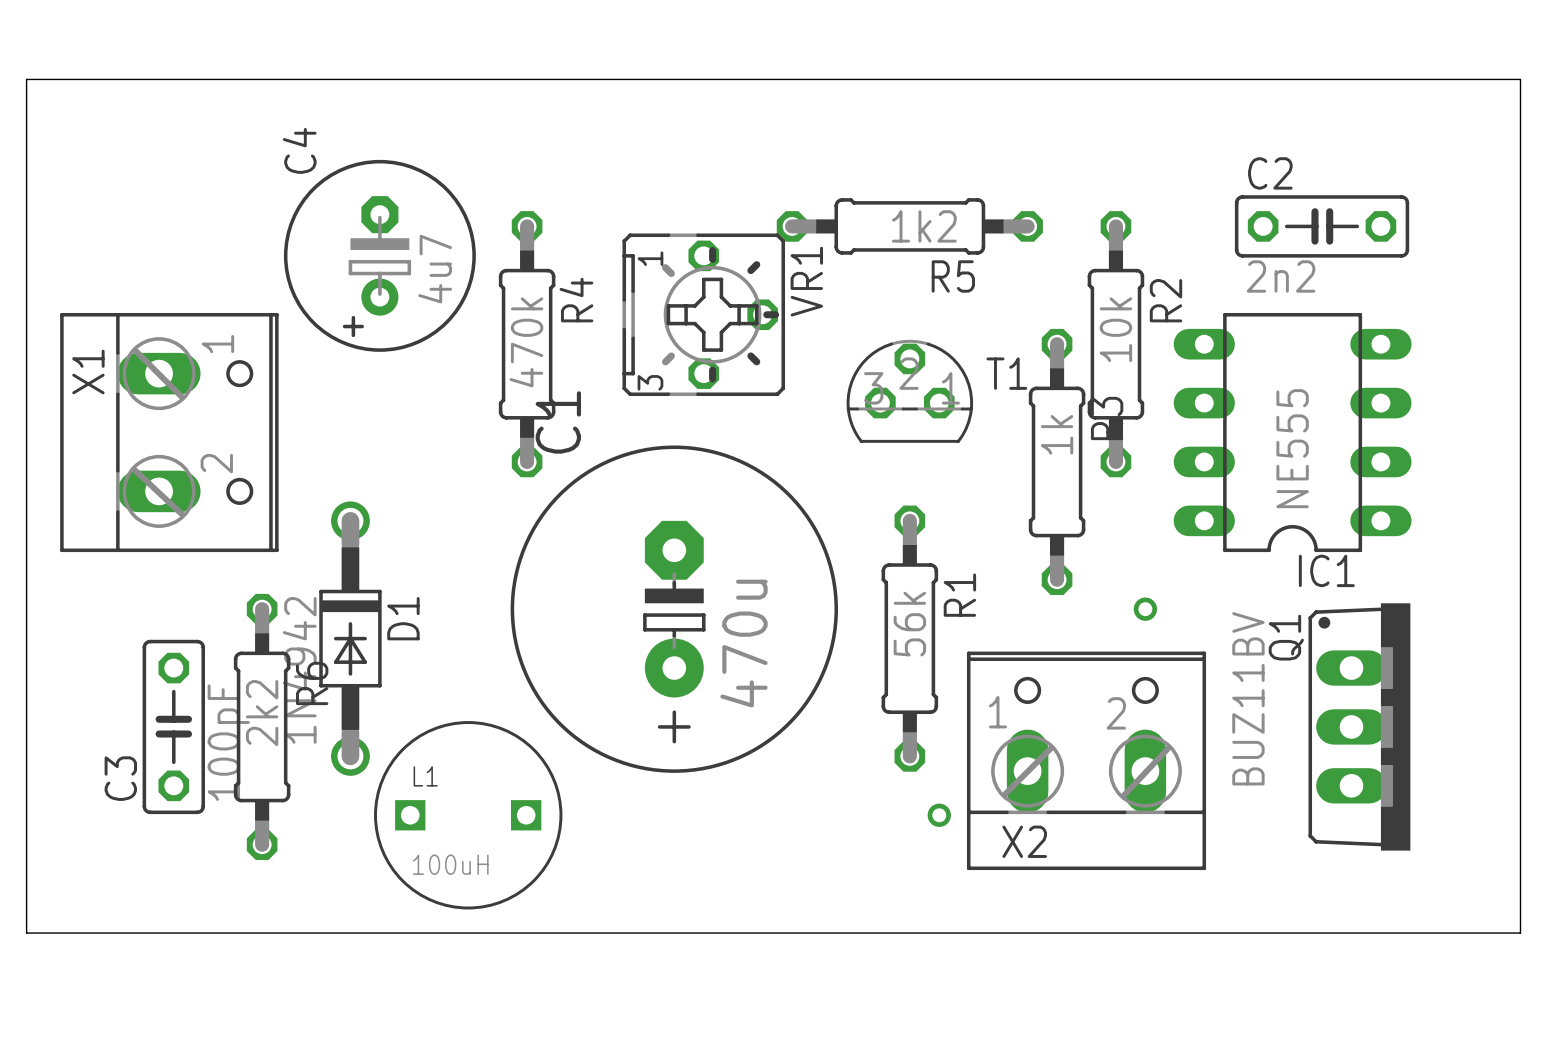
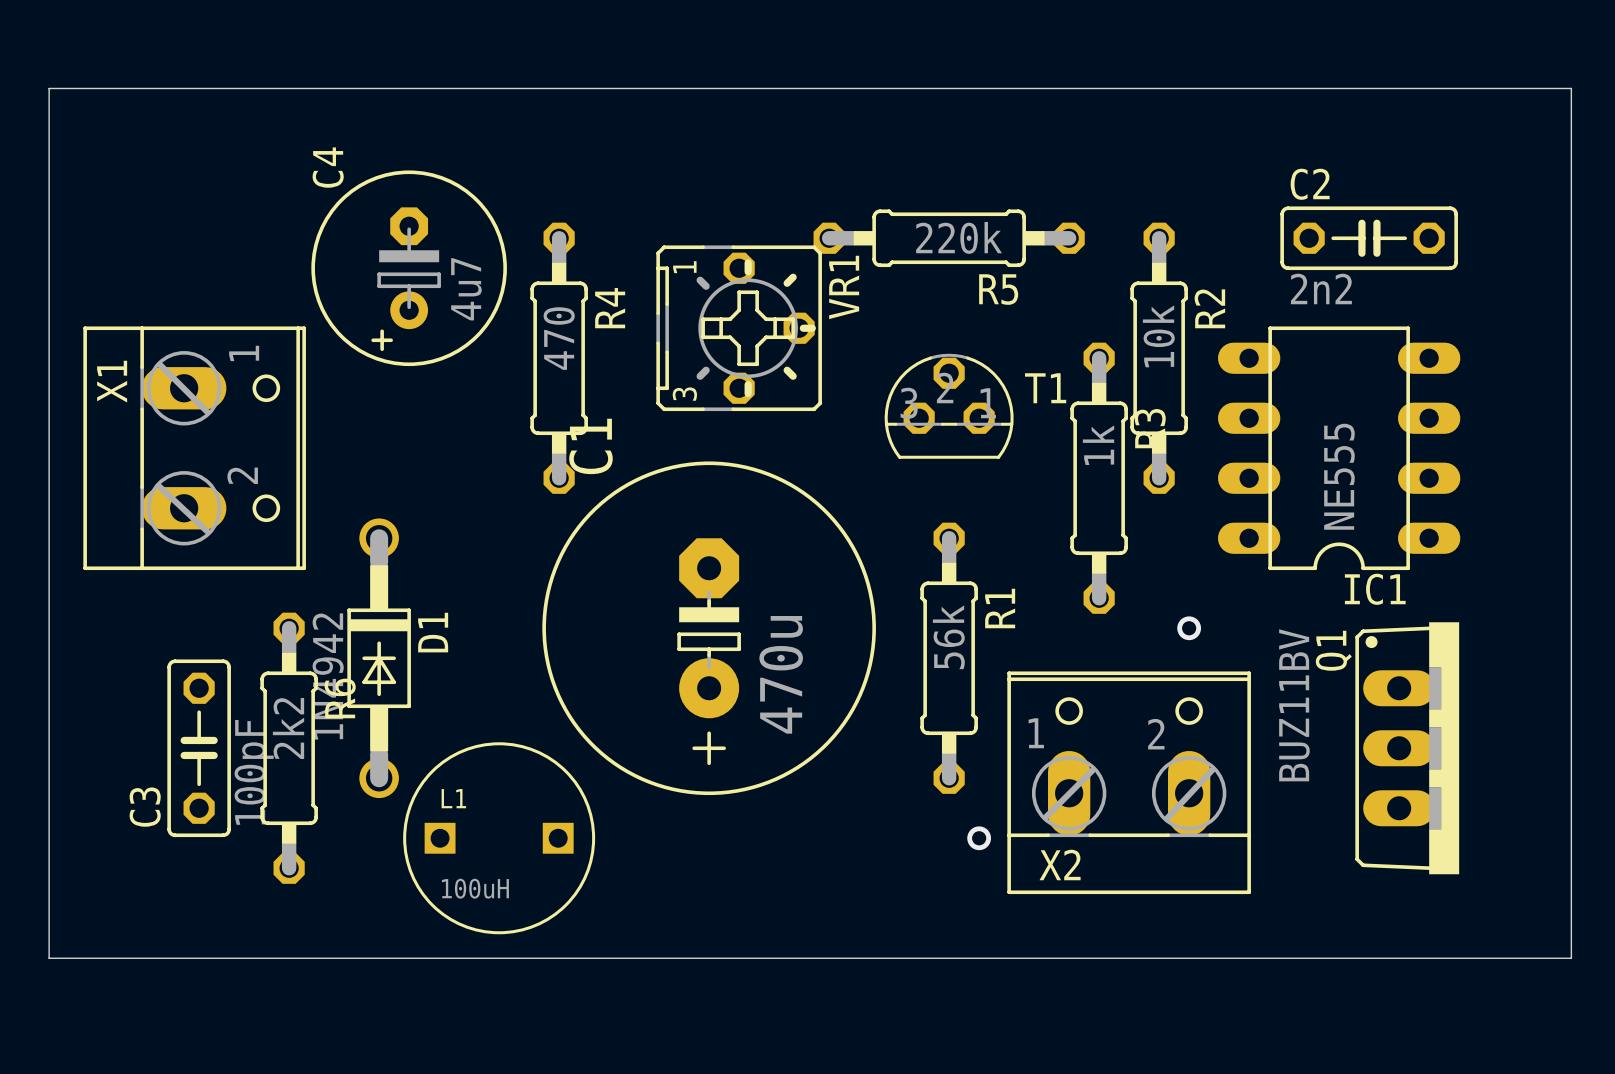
R5 value: 1k2 (924, 226) -> 220k (959, 237)
R4 value: 470k (526, 342) -> 470 (559, 338)

